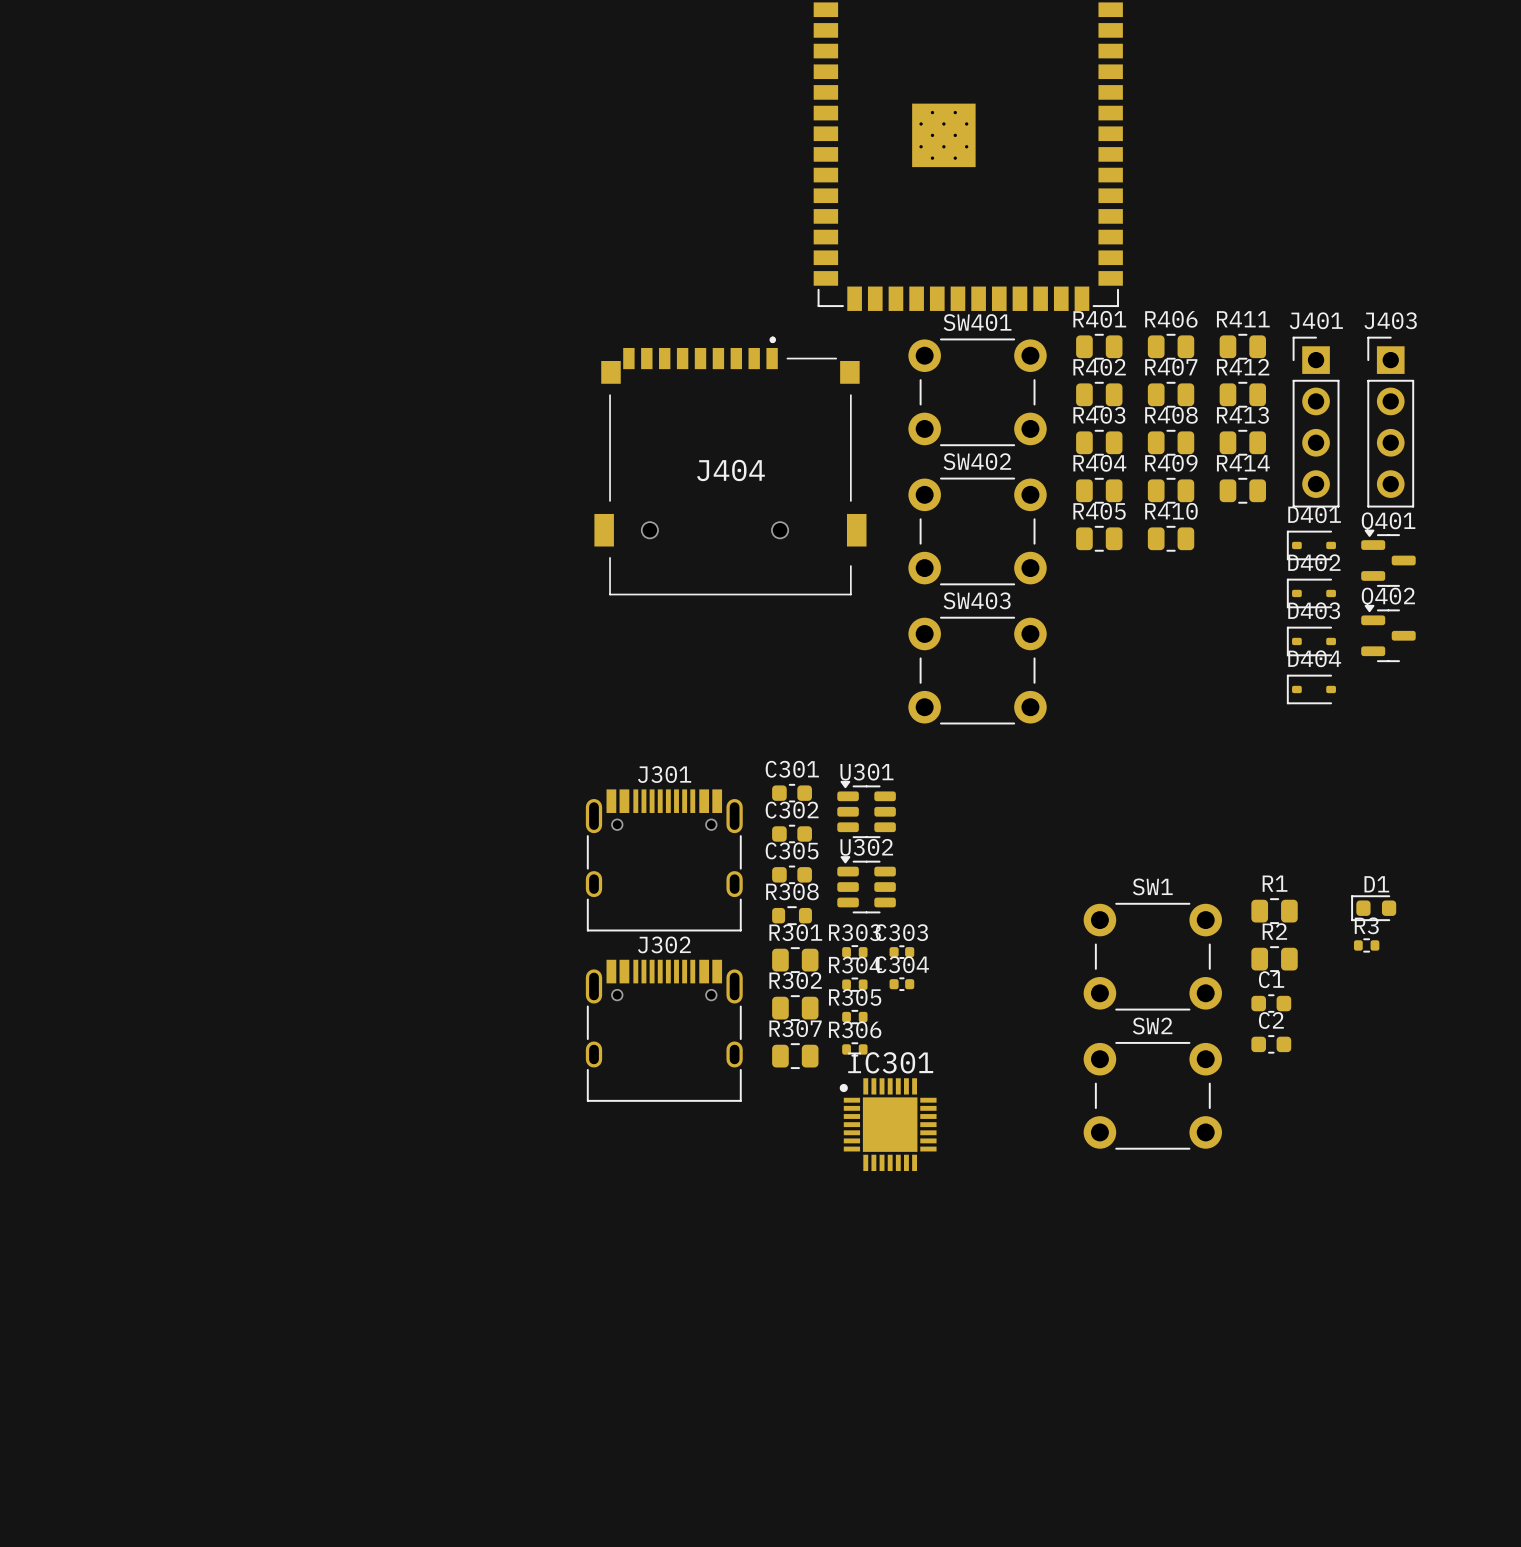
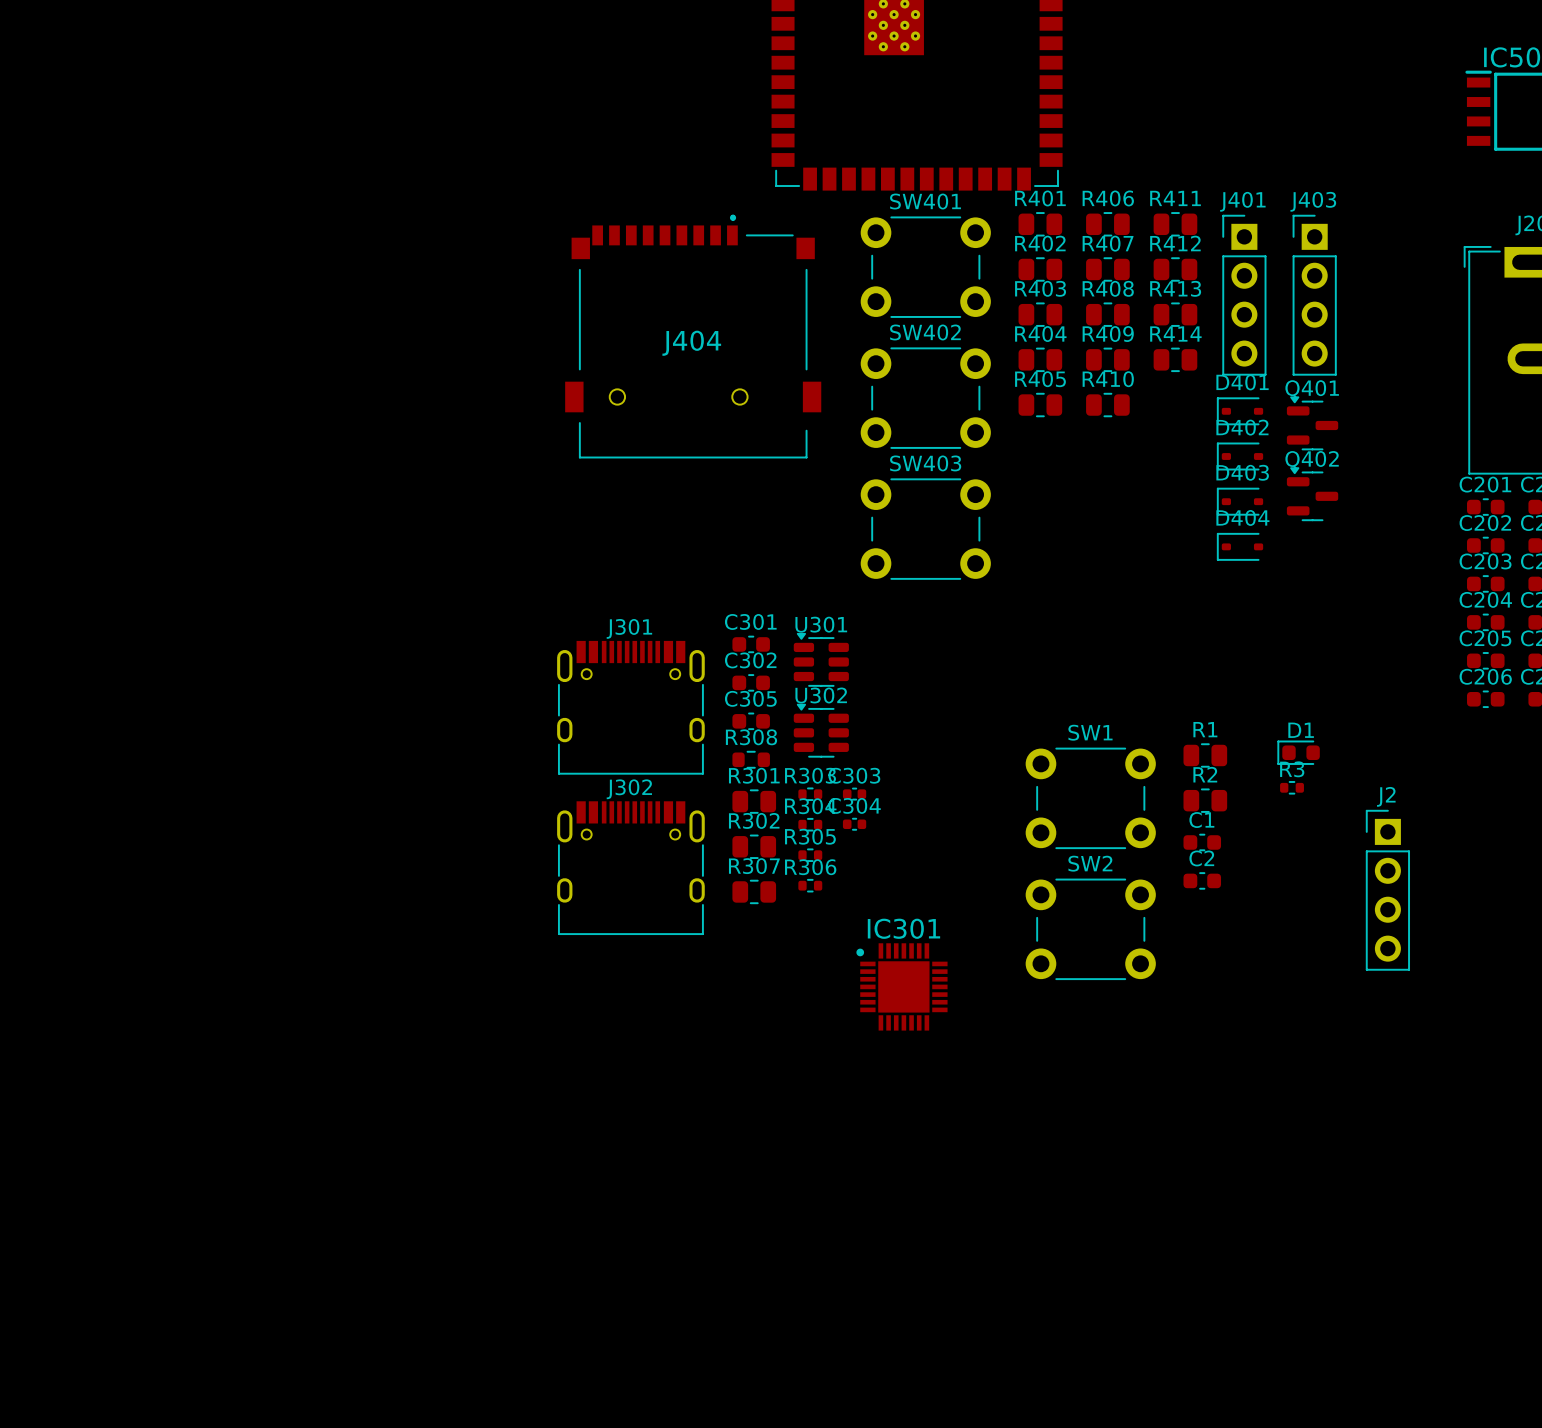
J2: none -> (1387, 890)
IC301 position: (888, 1124) -> (901, 986)

